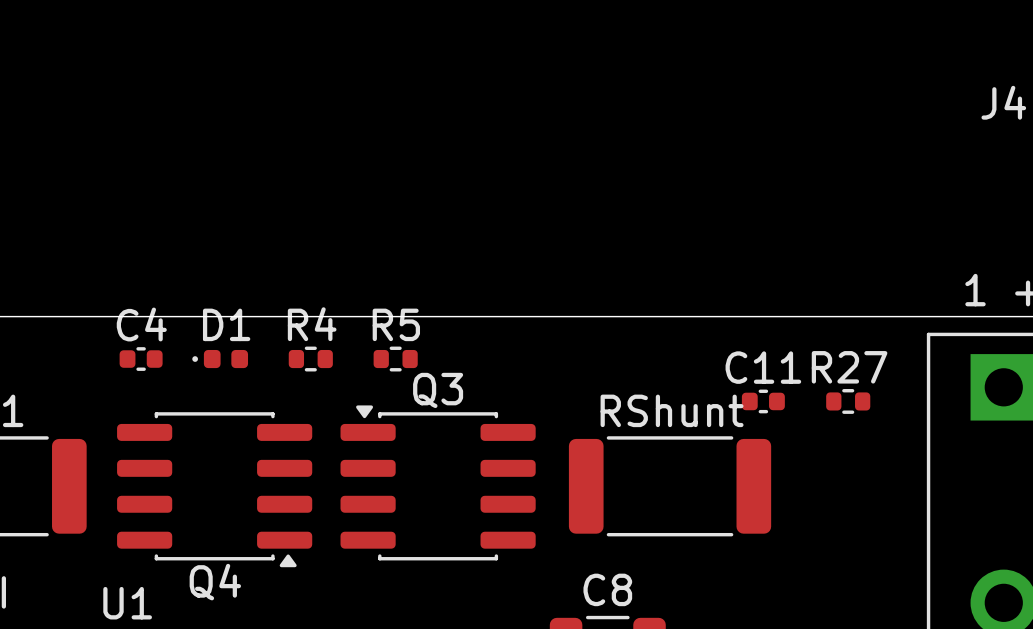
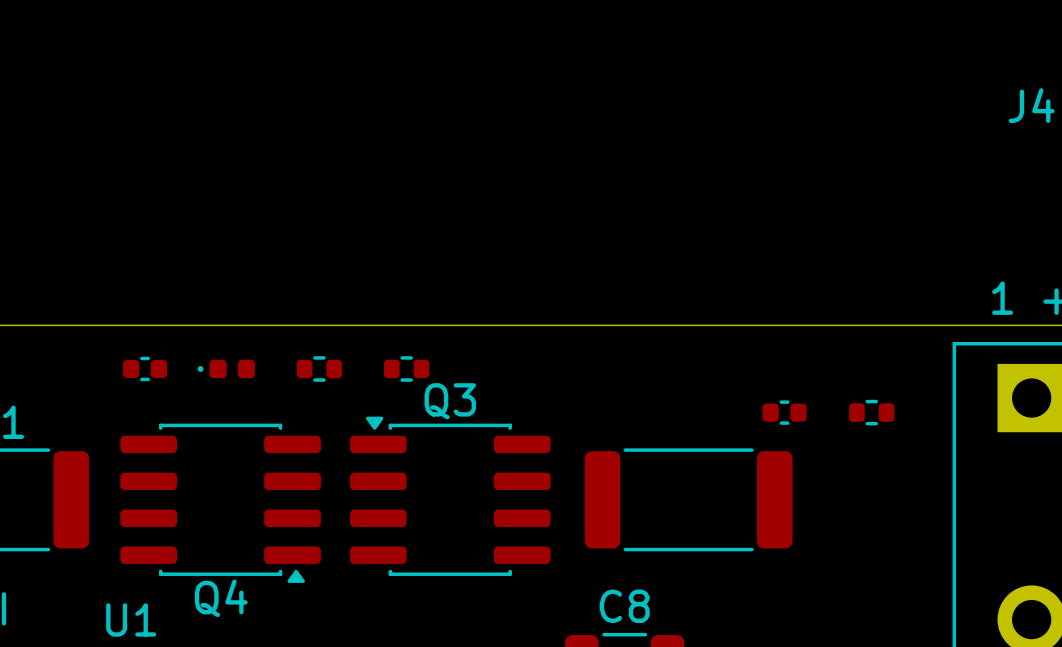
C4 name: C4 (141, 324) -> none
D1 name: D1 (226, 324) -> none
R4 name: R4 (312, 324) -> none
R5 name: R5 (396, 324) -> none
C11 name: C11 (763, 367) -> none
R27 name: R27 (849, 367) -> none
RShunt name: RShunt (672, 410) -> none

